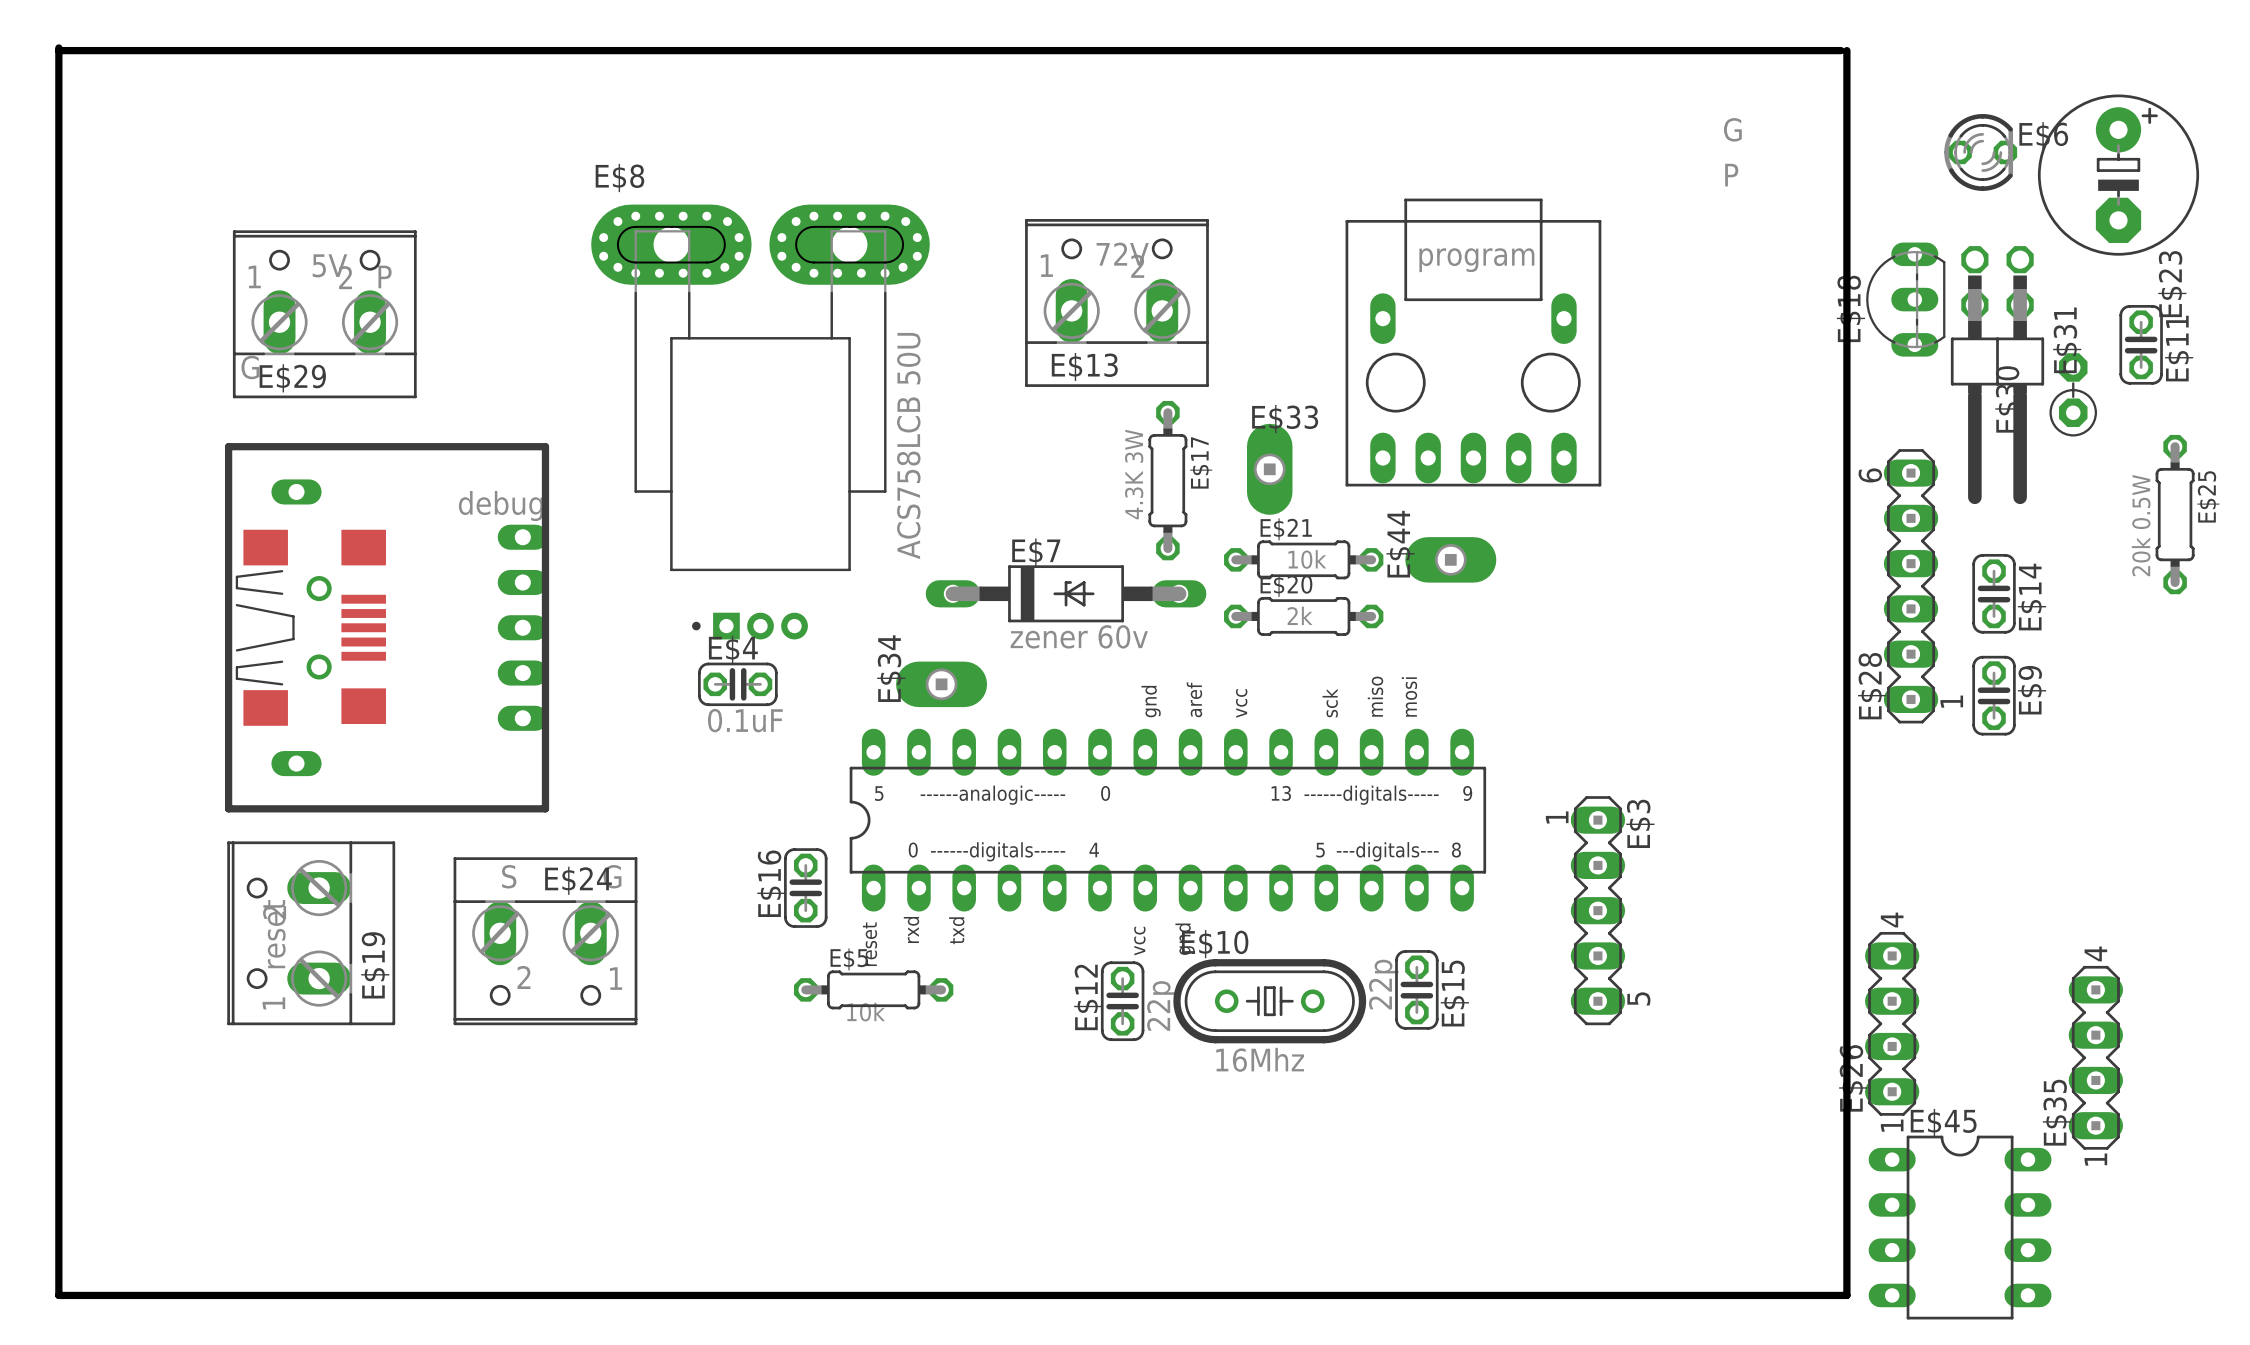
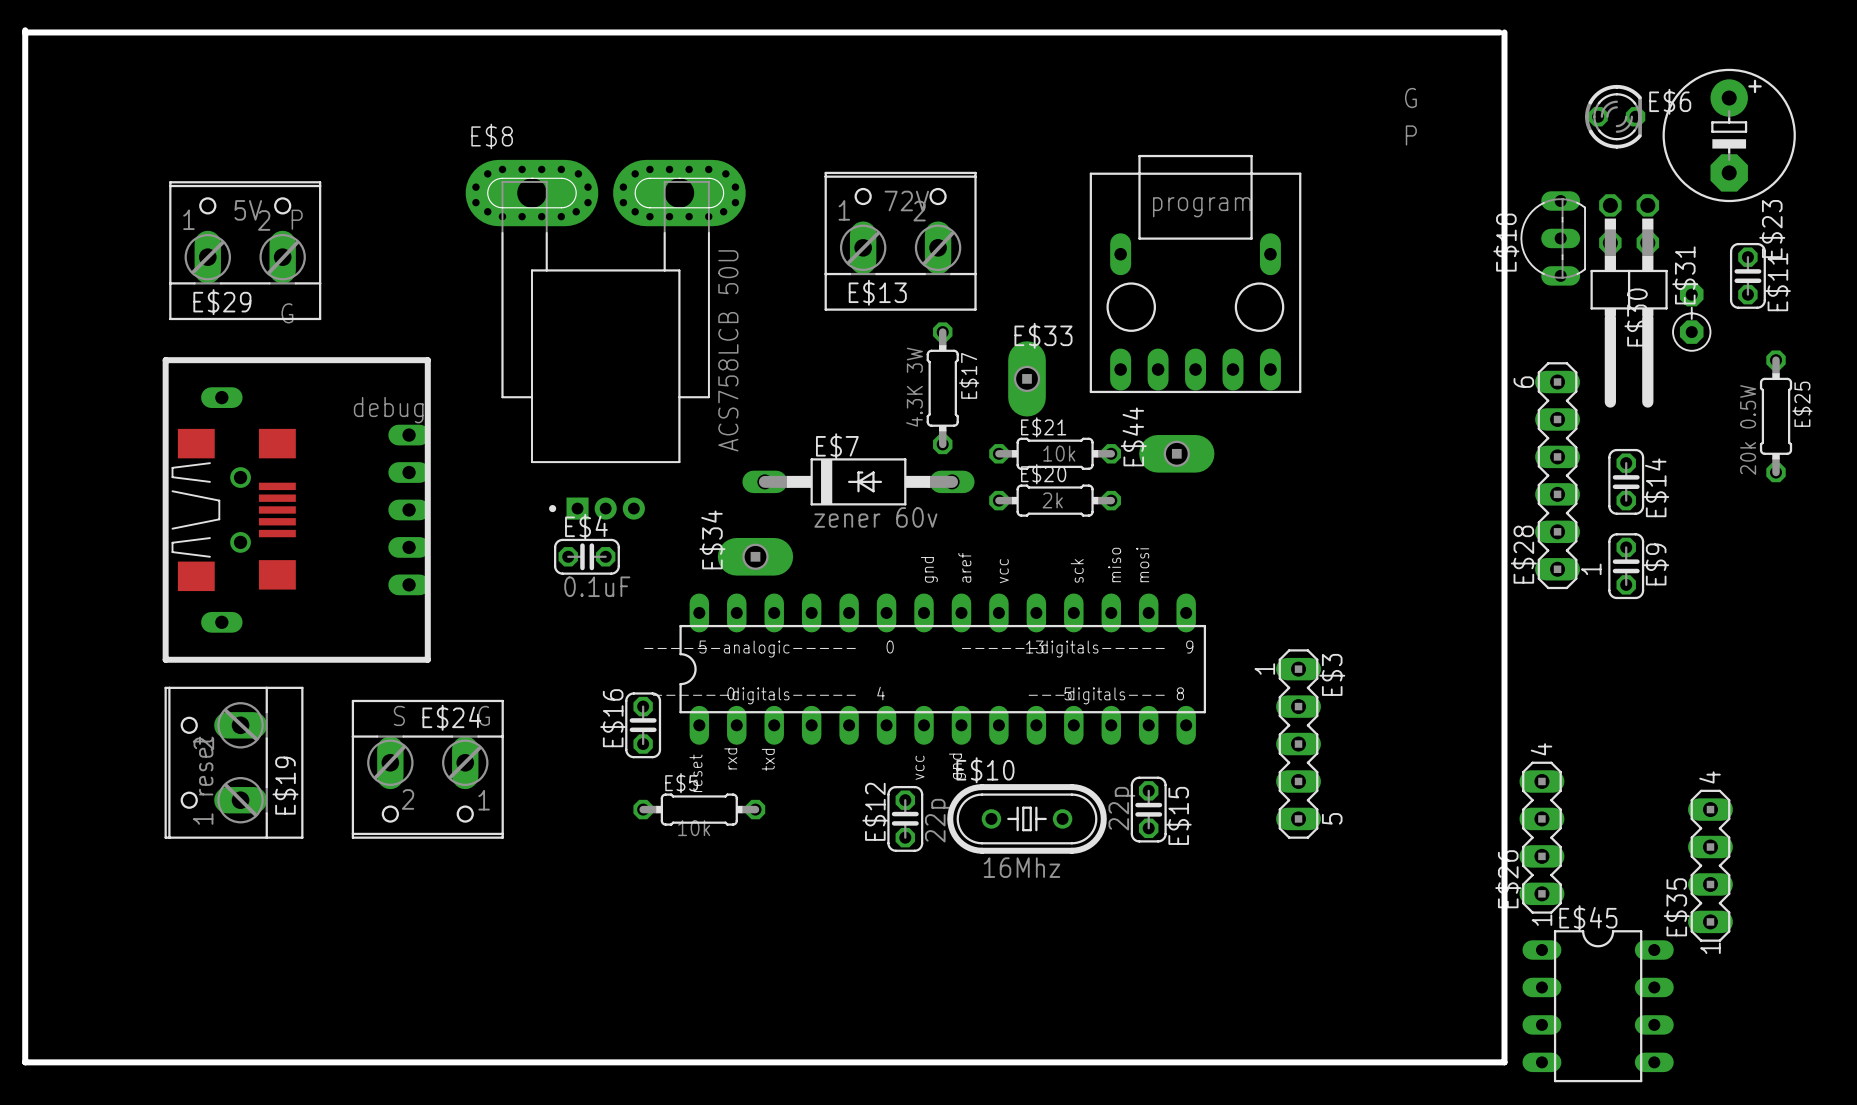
text position: G (250, 367) -> G (287, 313)

